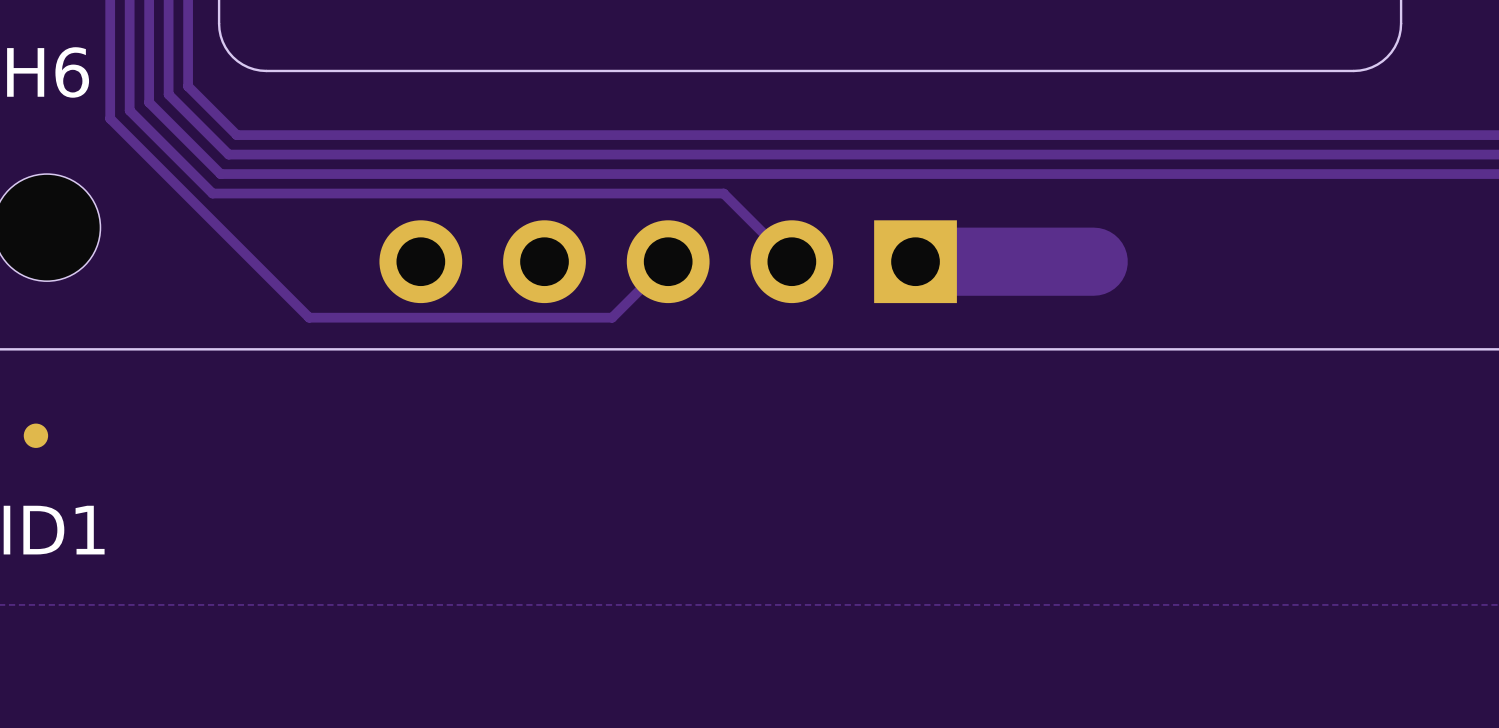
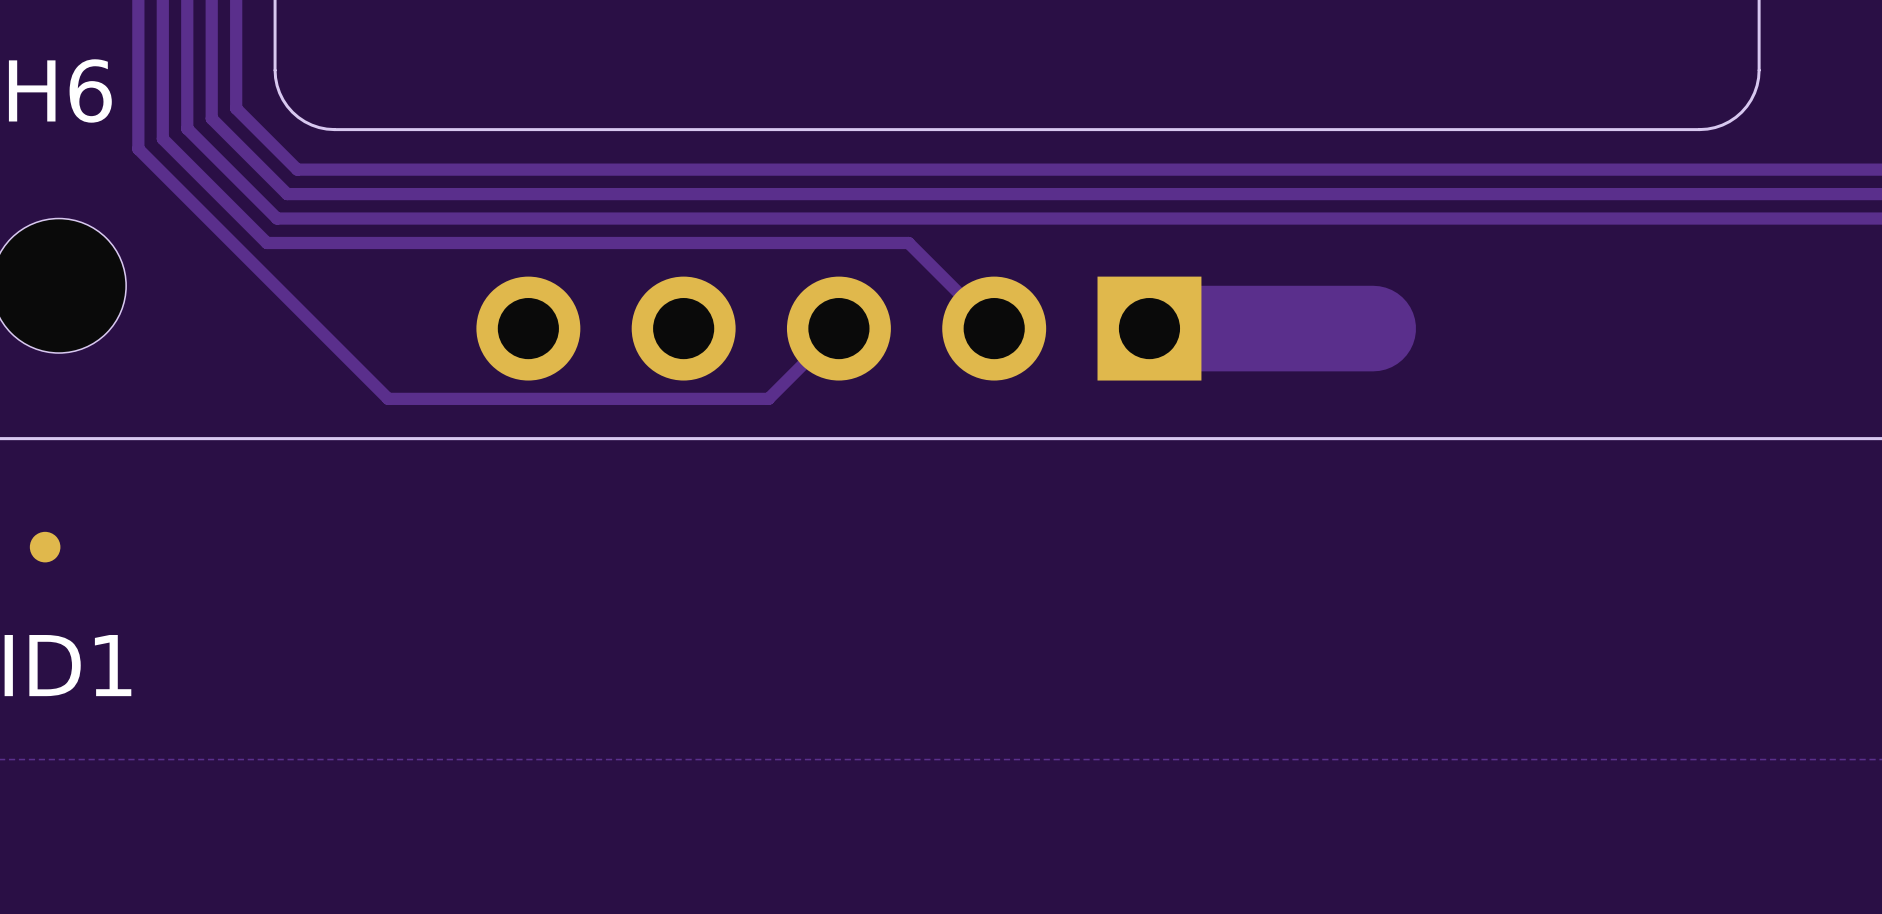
board edge: (219, 23) (222, 41) (232, 57) (248, 67) (266, 70) (1353, 70) (1371, 67) (1387, 57) (1397, 41) (1401, 23) -> (275, 29) (275, 77) (283, 99) (292, 112) (304, 121) (319, 127) (334, 129) (1707, 129) (1722, 125) (1735, 117) (1751, 99) (1758, 77) (1759, 29)

